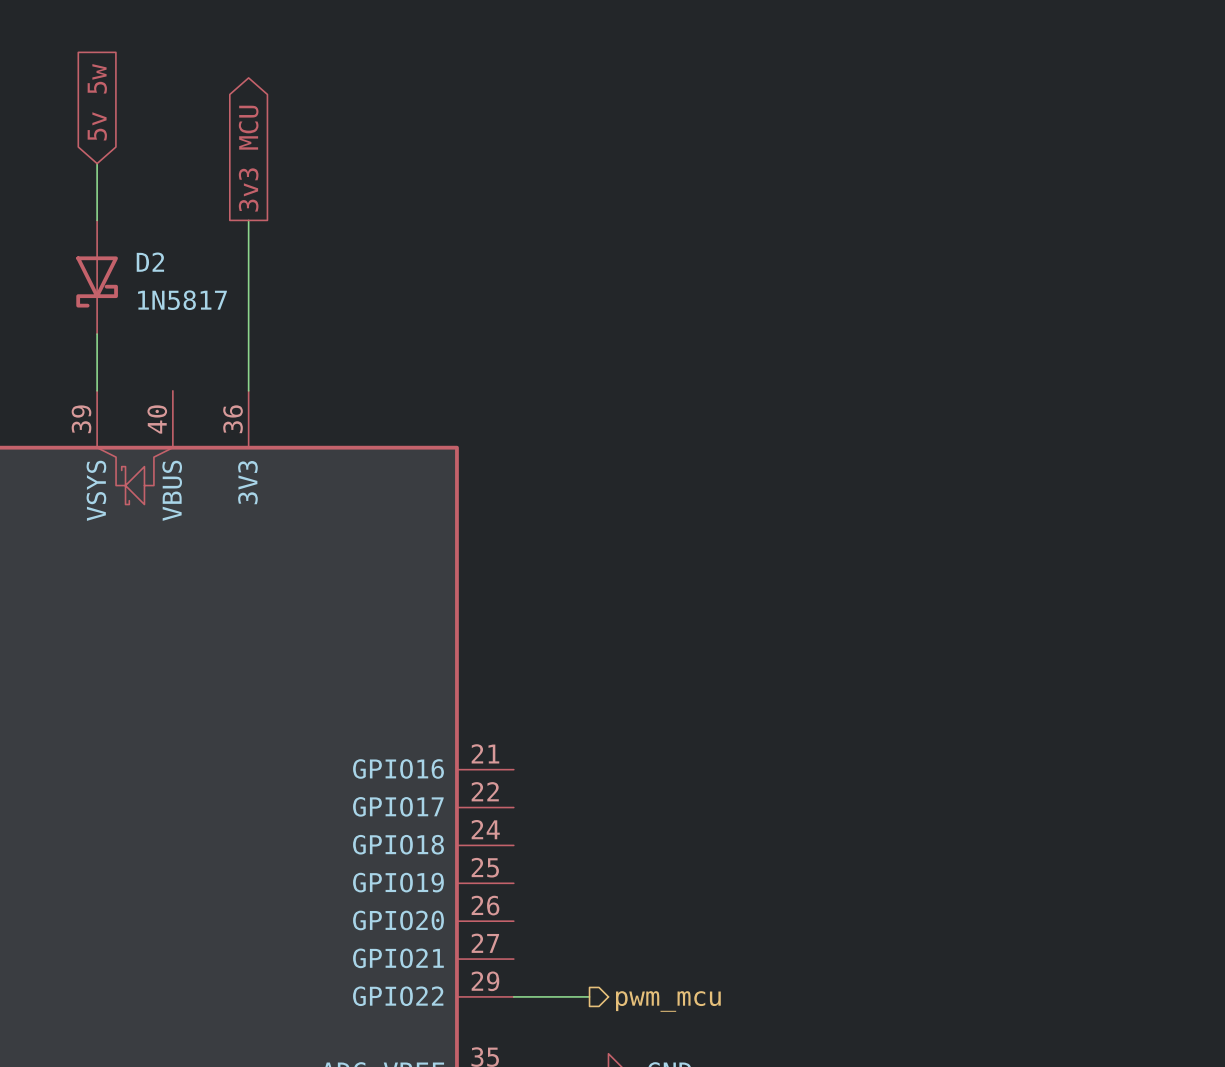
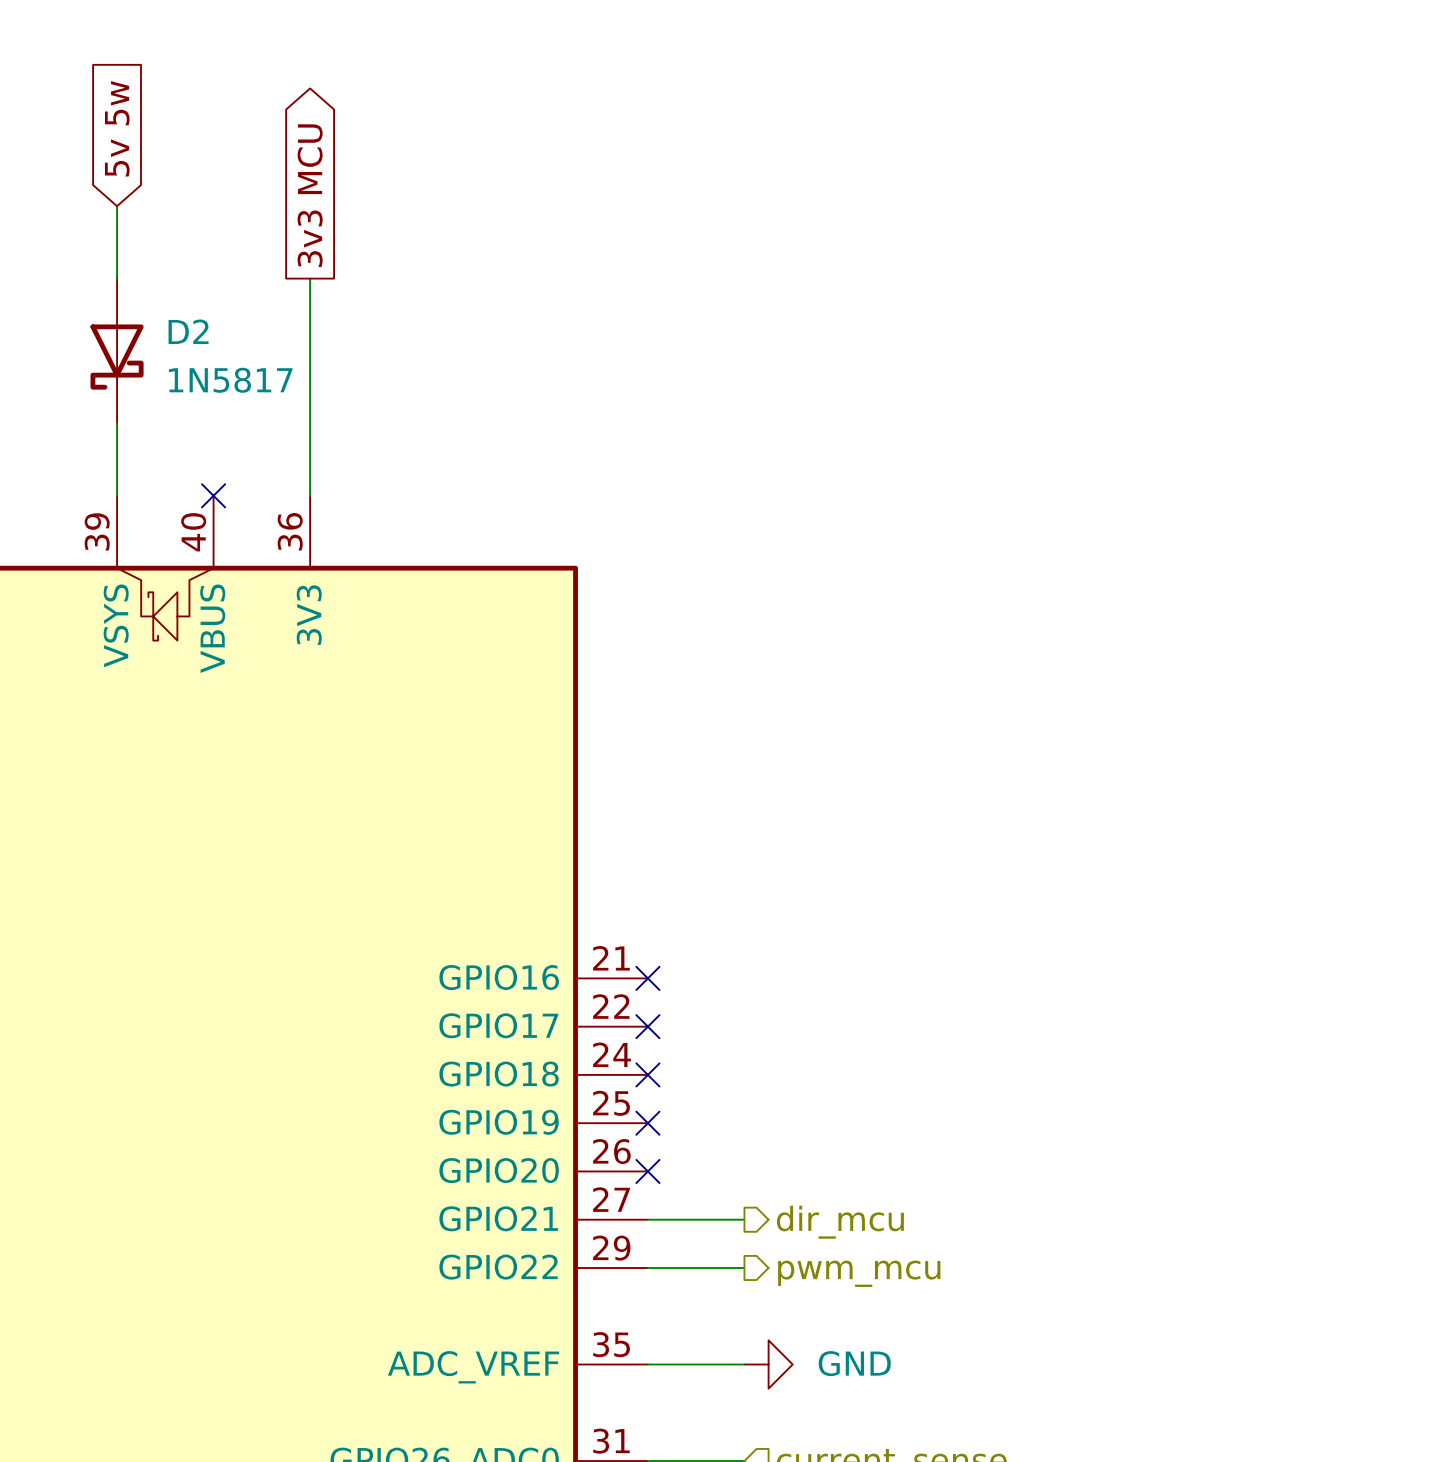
no-connect mark: none -> (213, 495)
no-connect mark: none -> (647, 978)
no-connect mark: none -> (647, 1026)
no-connect mark: none -> (647, 1074)
no-connect mark: none -> (647, 1123)
no-connect mark: none -> (647, 1171)
wire: none -> (647, 1219) (744, 1219)
hierarchical label: none -> dir_mcu (840, 1222)

